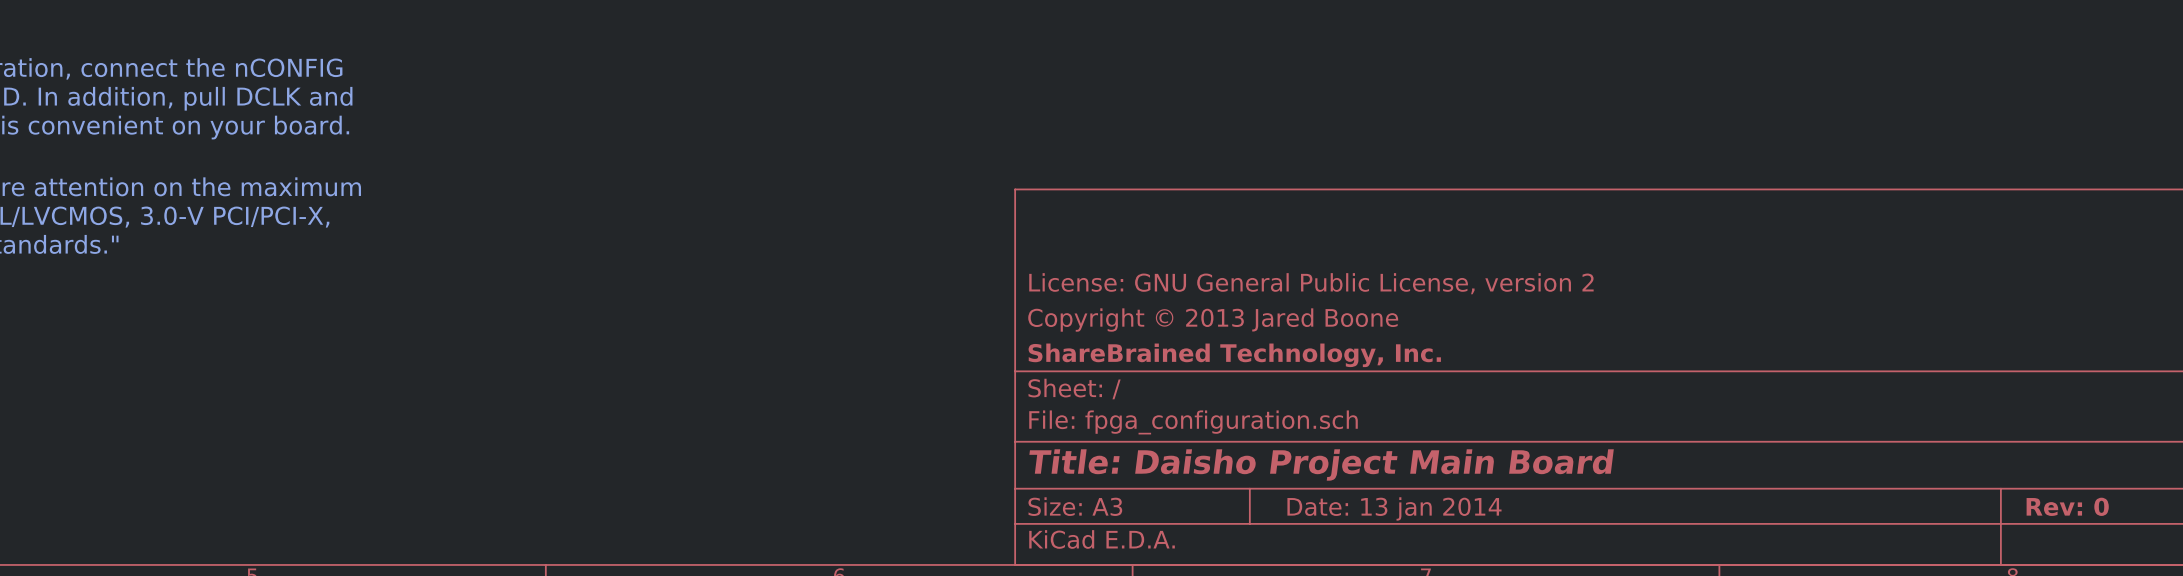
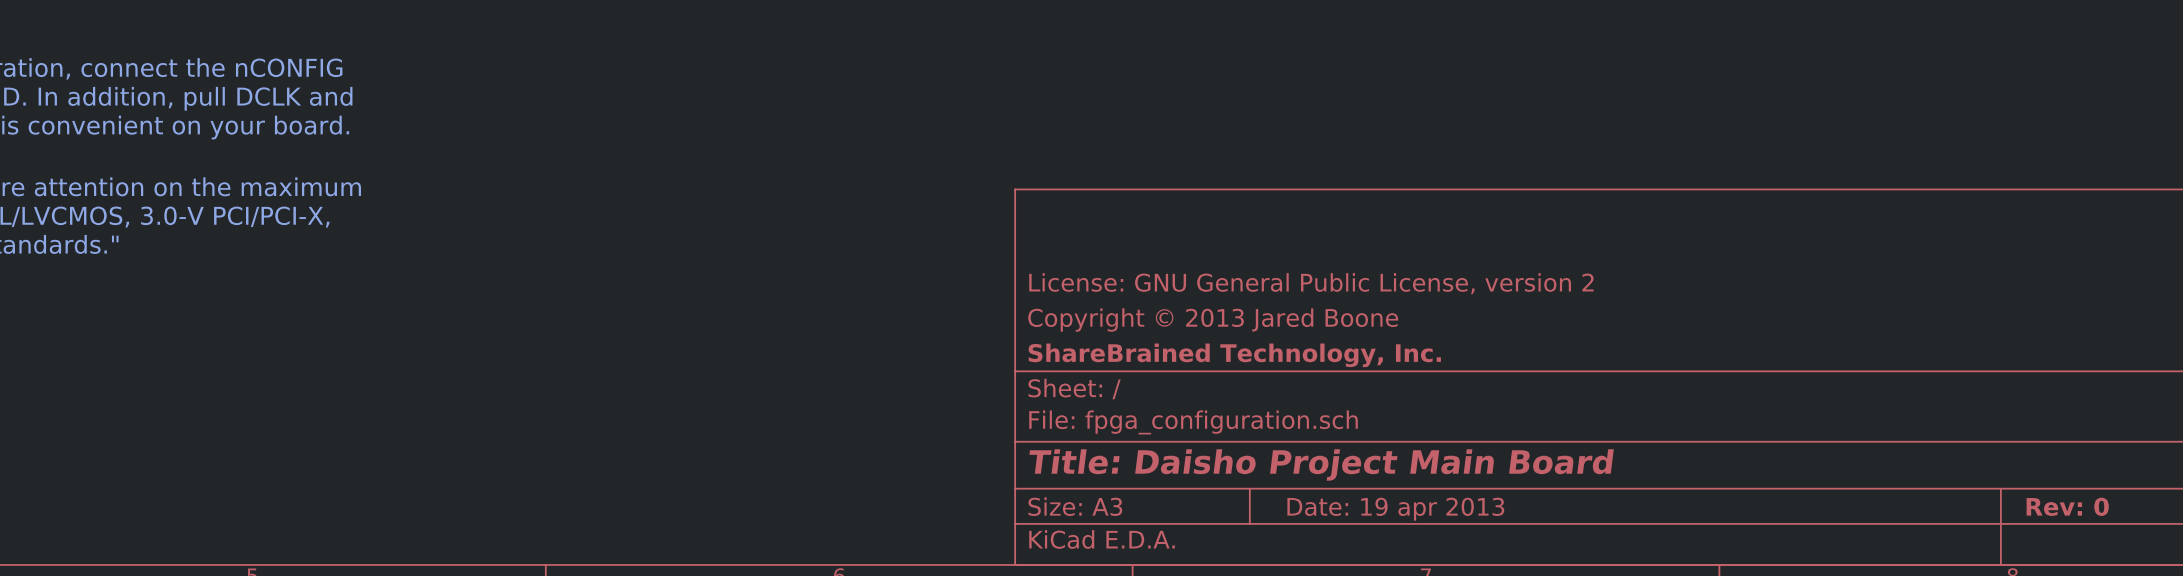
title block: Date: 13 jan 2014 (1394, 508) -> Date: 19 apr 2013 (1395, 509)

